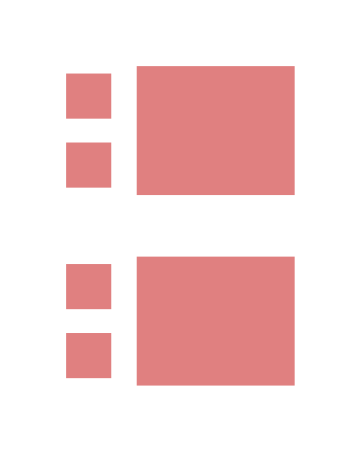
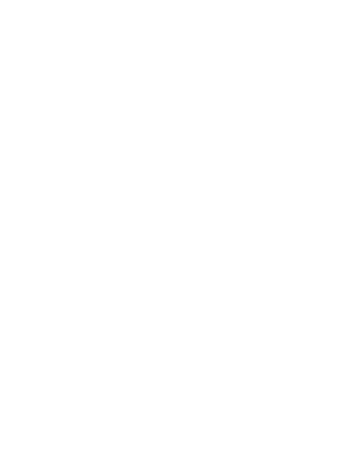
part: (180, 130) -> none
part: (180, 321) -> none

